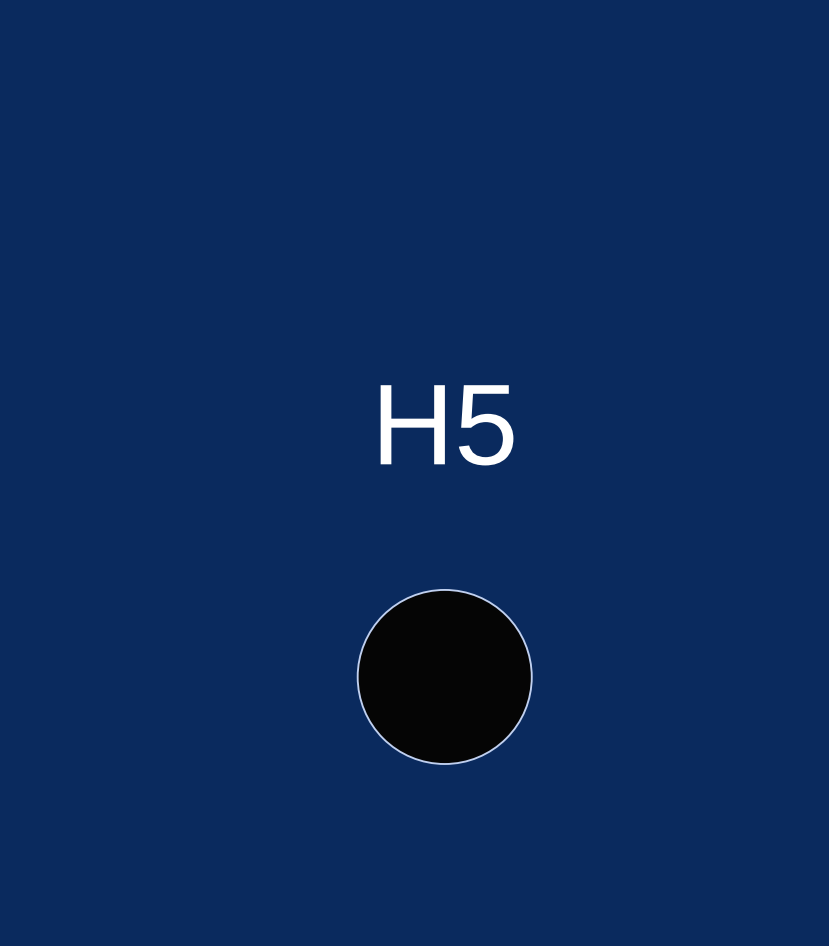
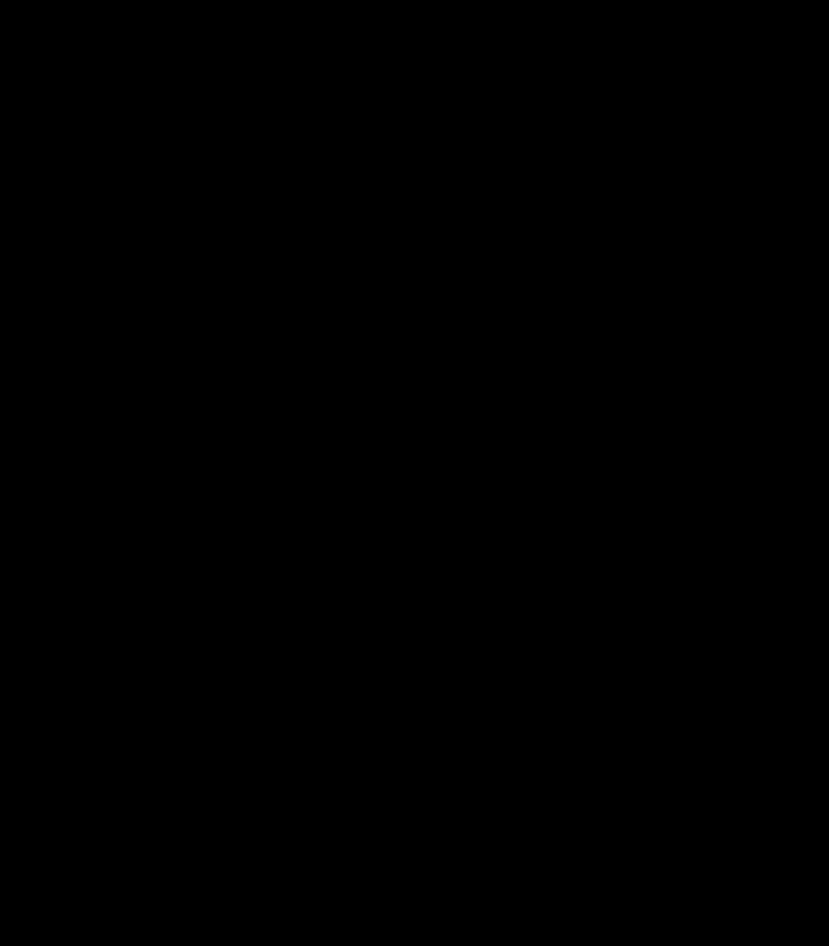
H5: (444, 676) -> none

